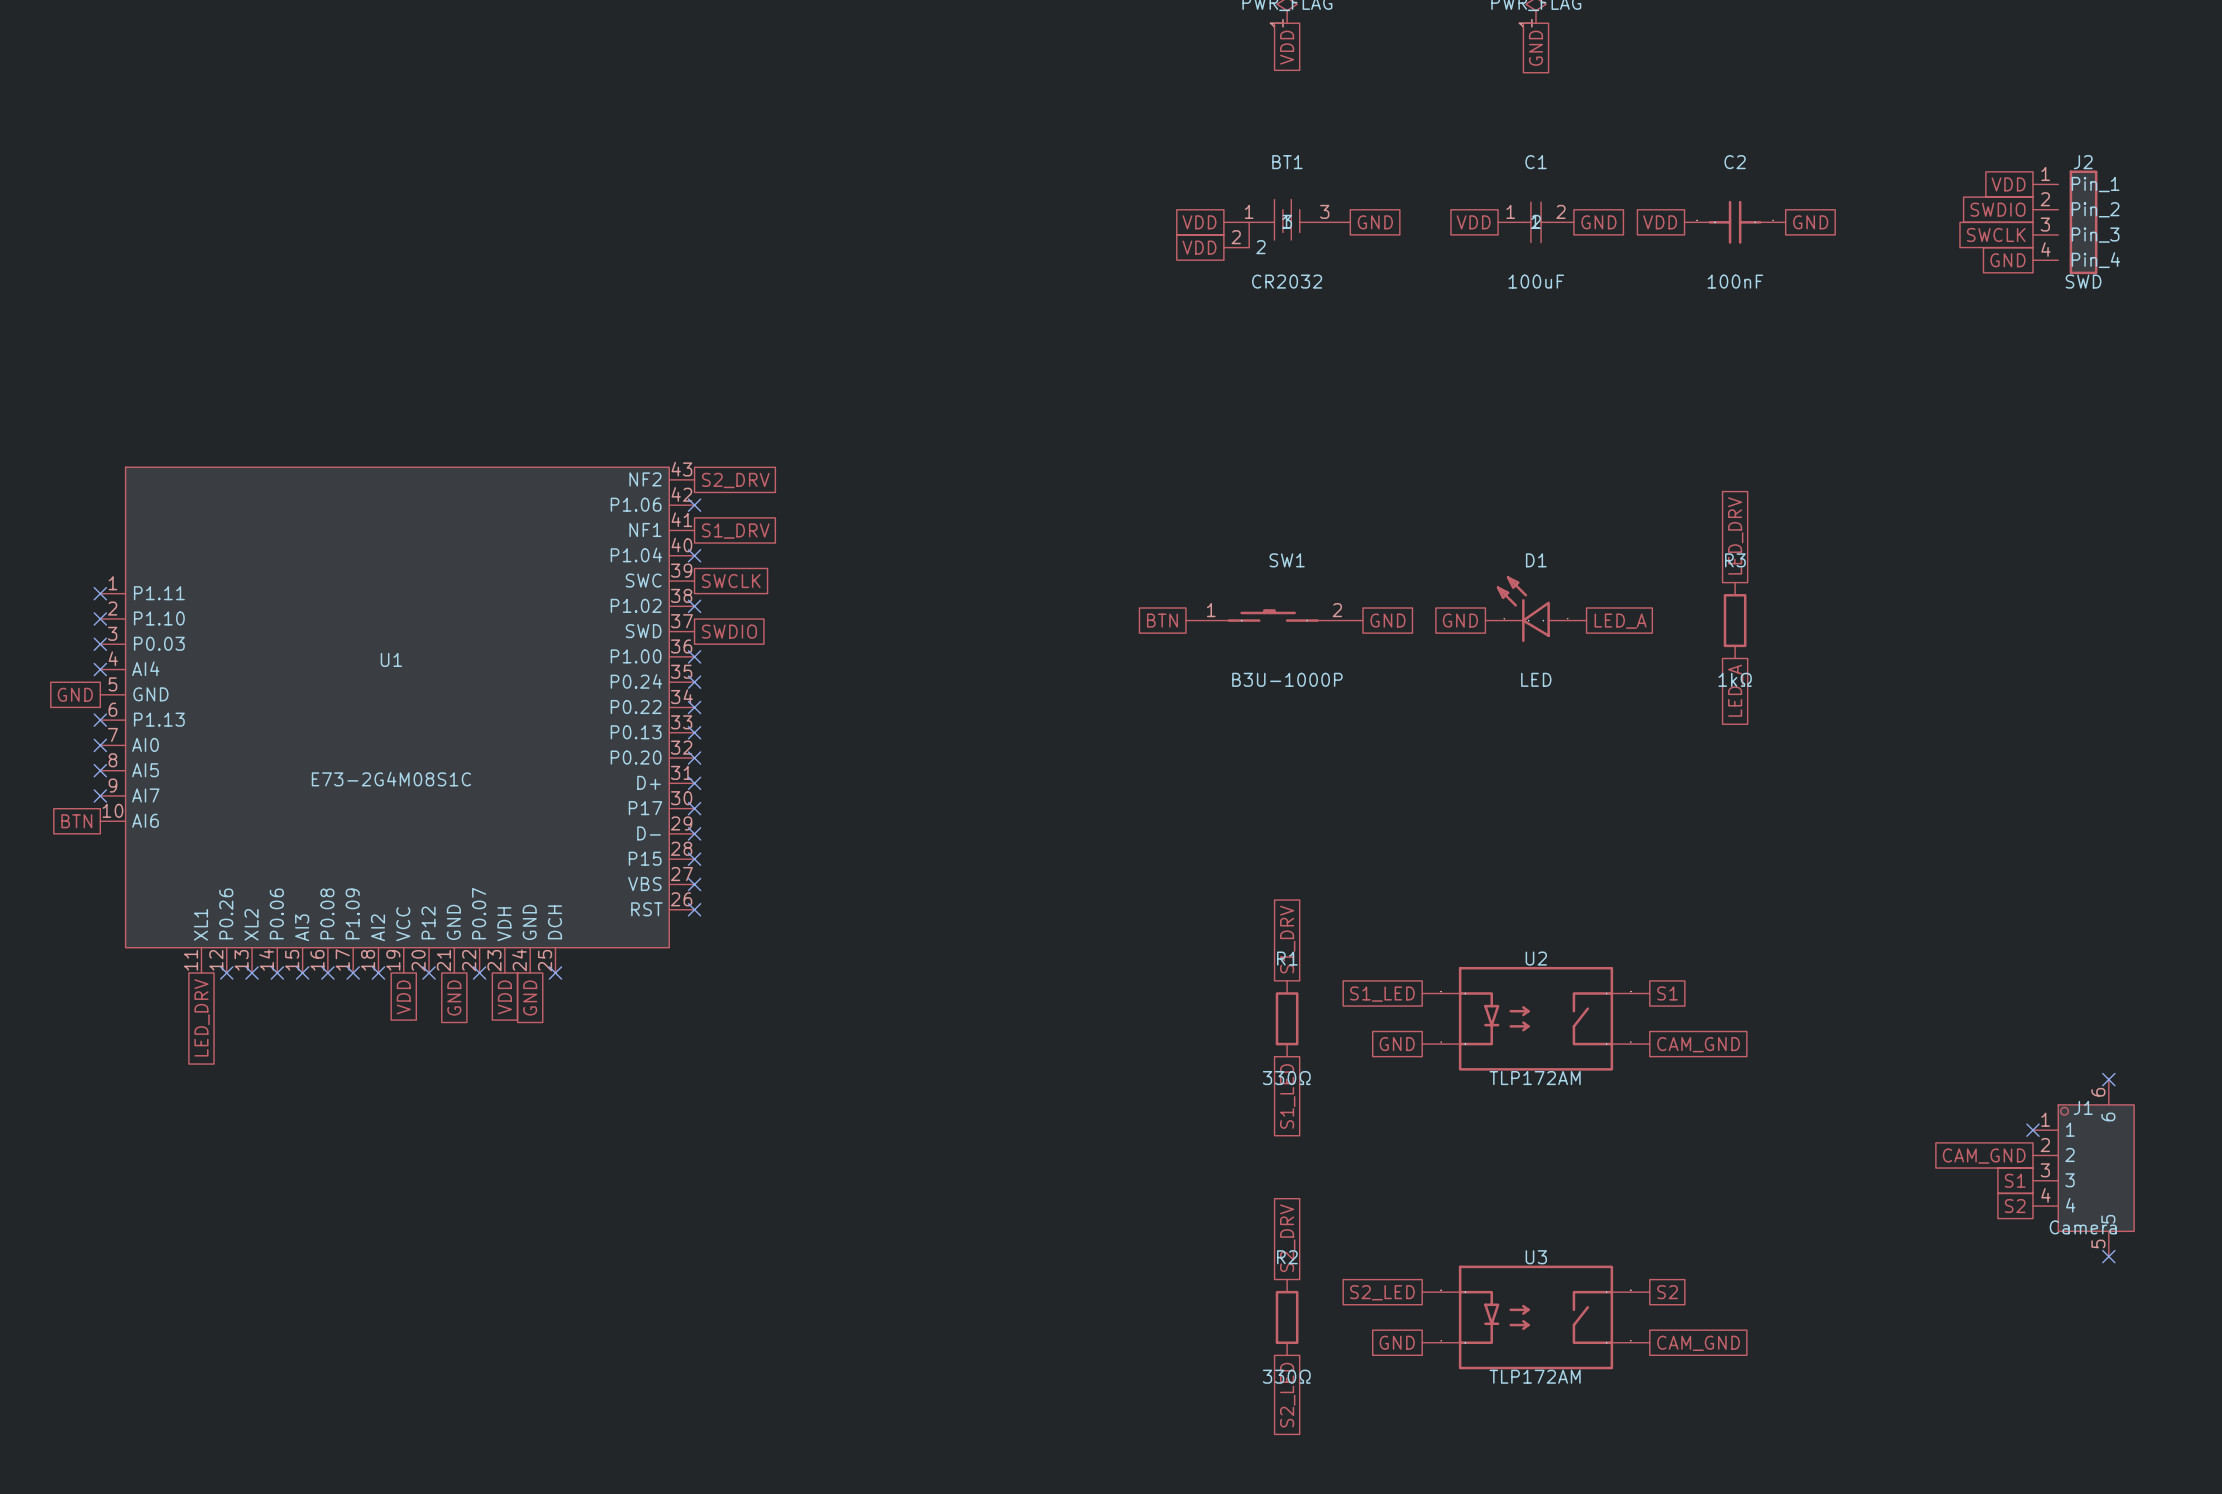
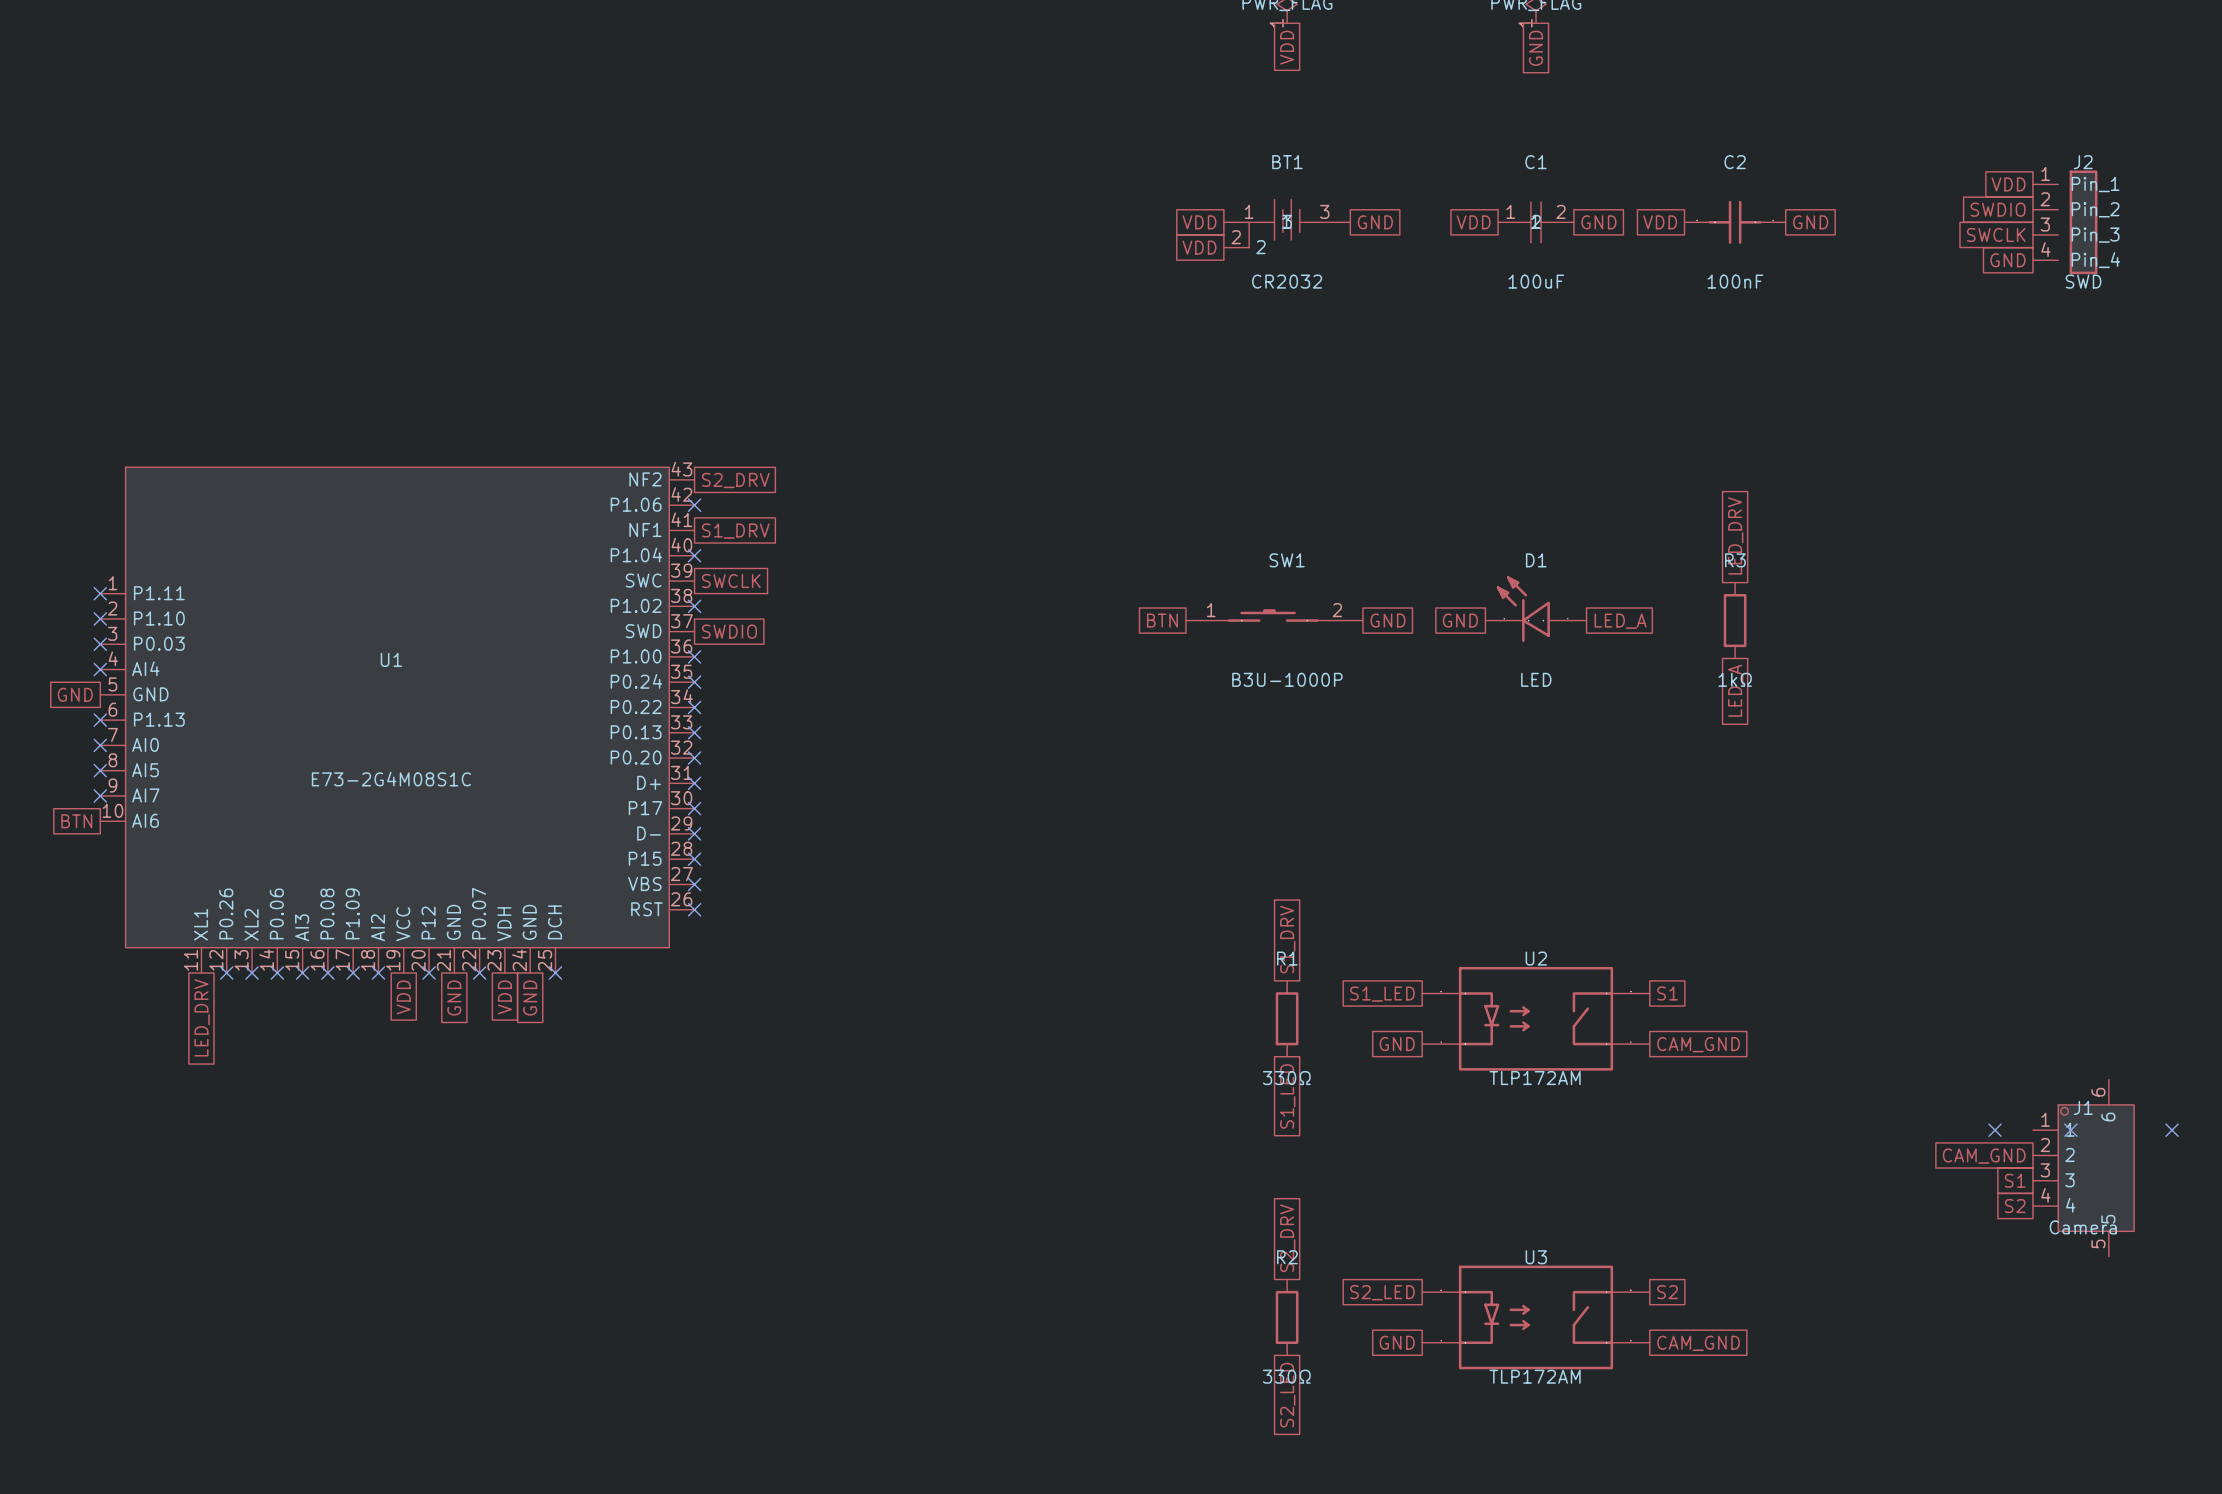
no-connect mark: (2108, 1079) -> none
no-connect mark: none -> (1995, 1130)
no-connect mark: (2032, 1130) -> none
no-connect mark: none -> (2070, 1130)
no-connect mark: none -> (2172, 1130)
no-connect mark: (2108, 1256) -> none

